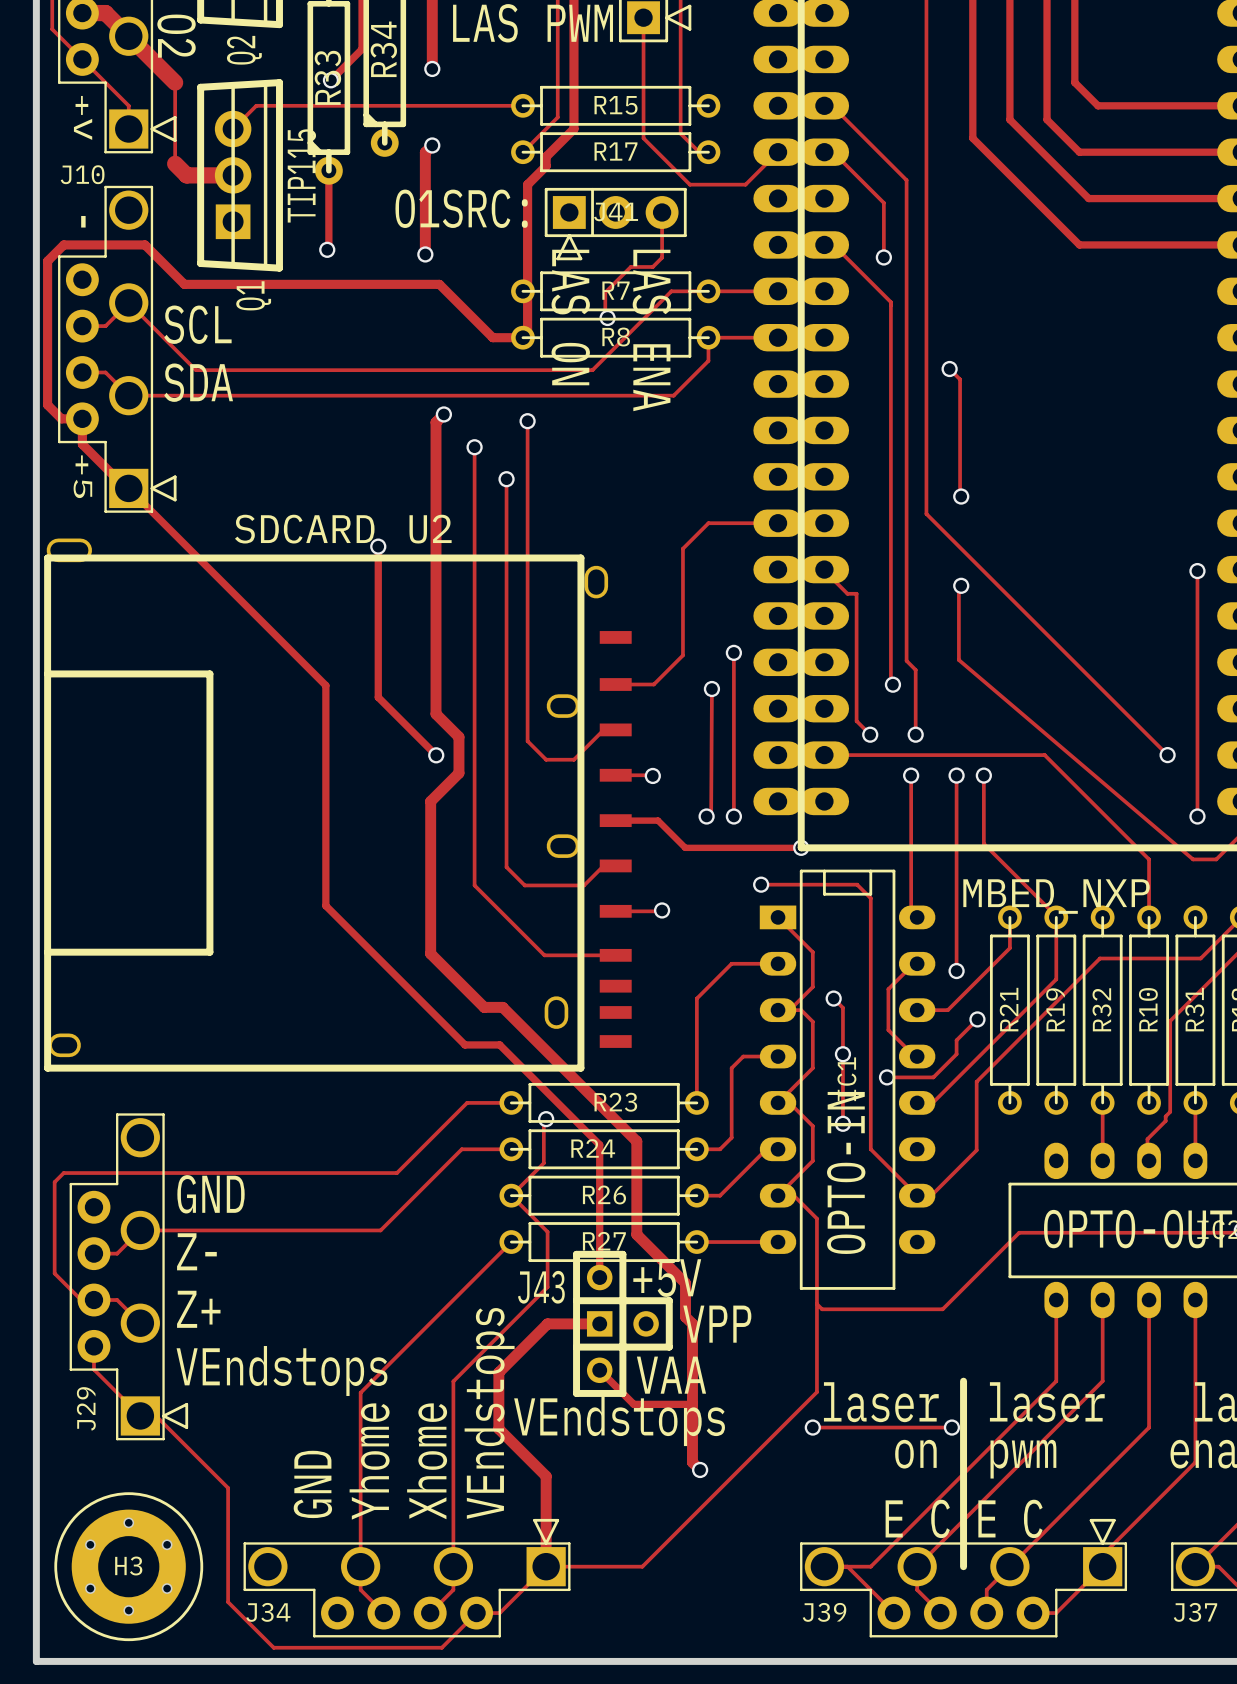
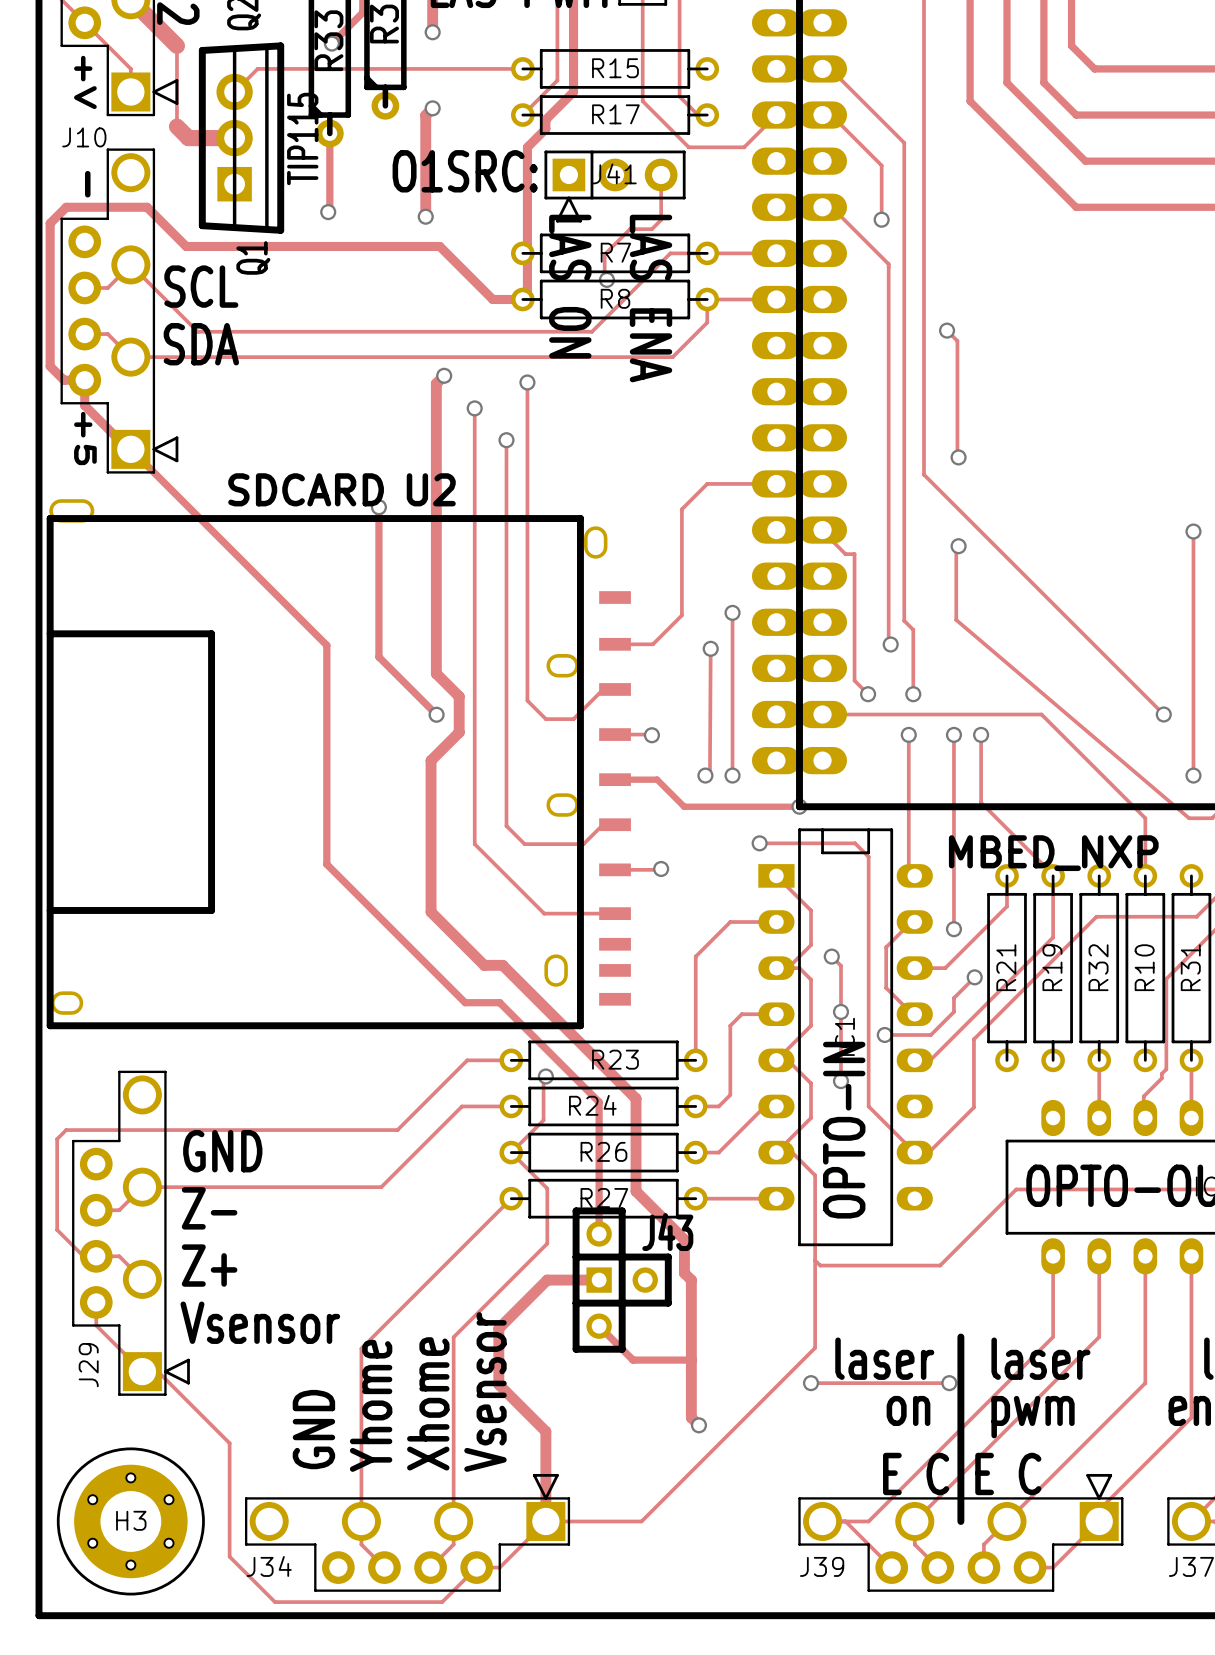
text: +5V (667, 1278) -> none
J43 name position: J43 (541, 1287) -> J43 (667, 1232)
text: VPP (717, 1324) -> none
text: VEndstops (281, 1371) -> Vsensor (260, 1322)
text: VAA (671, 1375) -> none
text: VEndstops (489, 1413) -> Vsensor (485, 1392)
text: VEndstops (619, 1421) -> none

